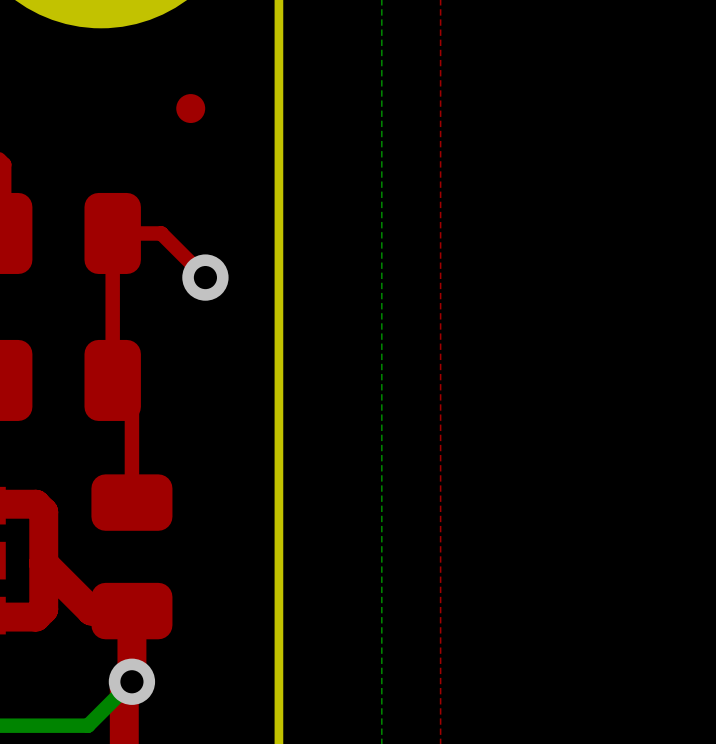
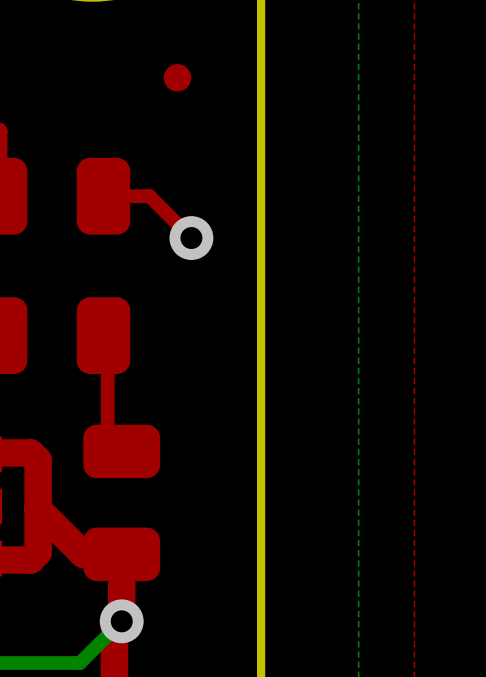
top track: (112, 233) (112, 380) (131, 399) (131, 502) -> none
top track: none -> (107, 339) (107, 451)

